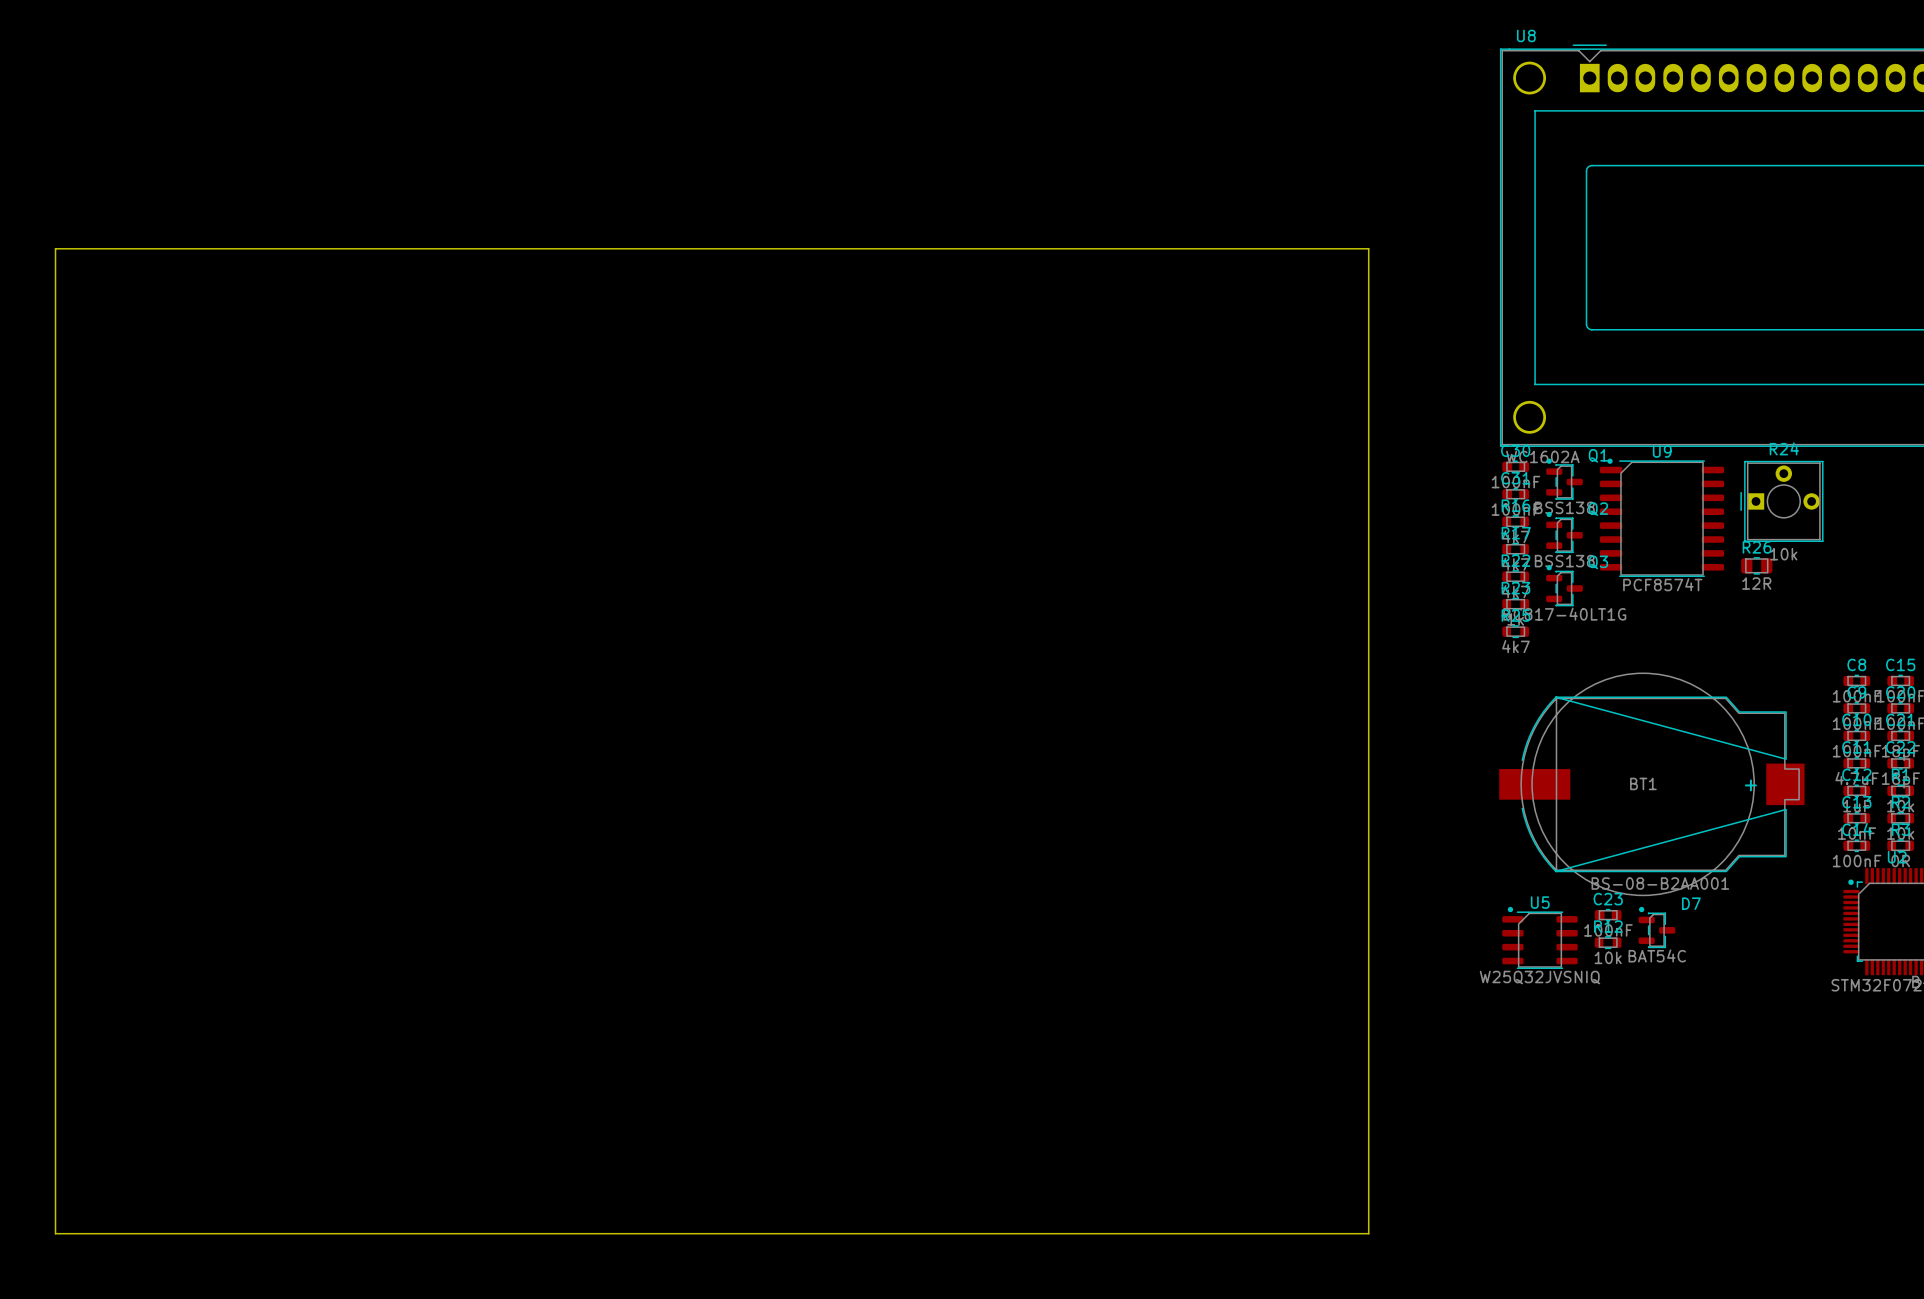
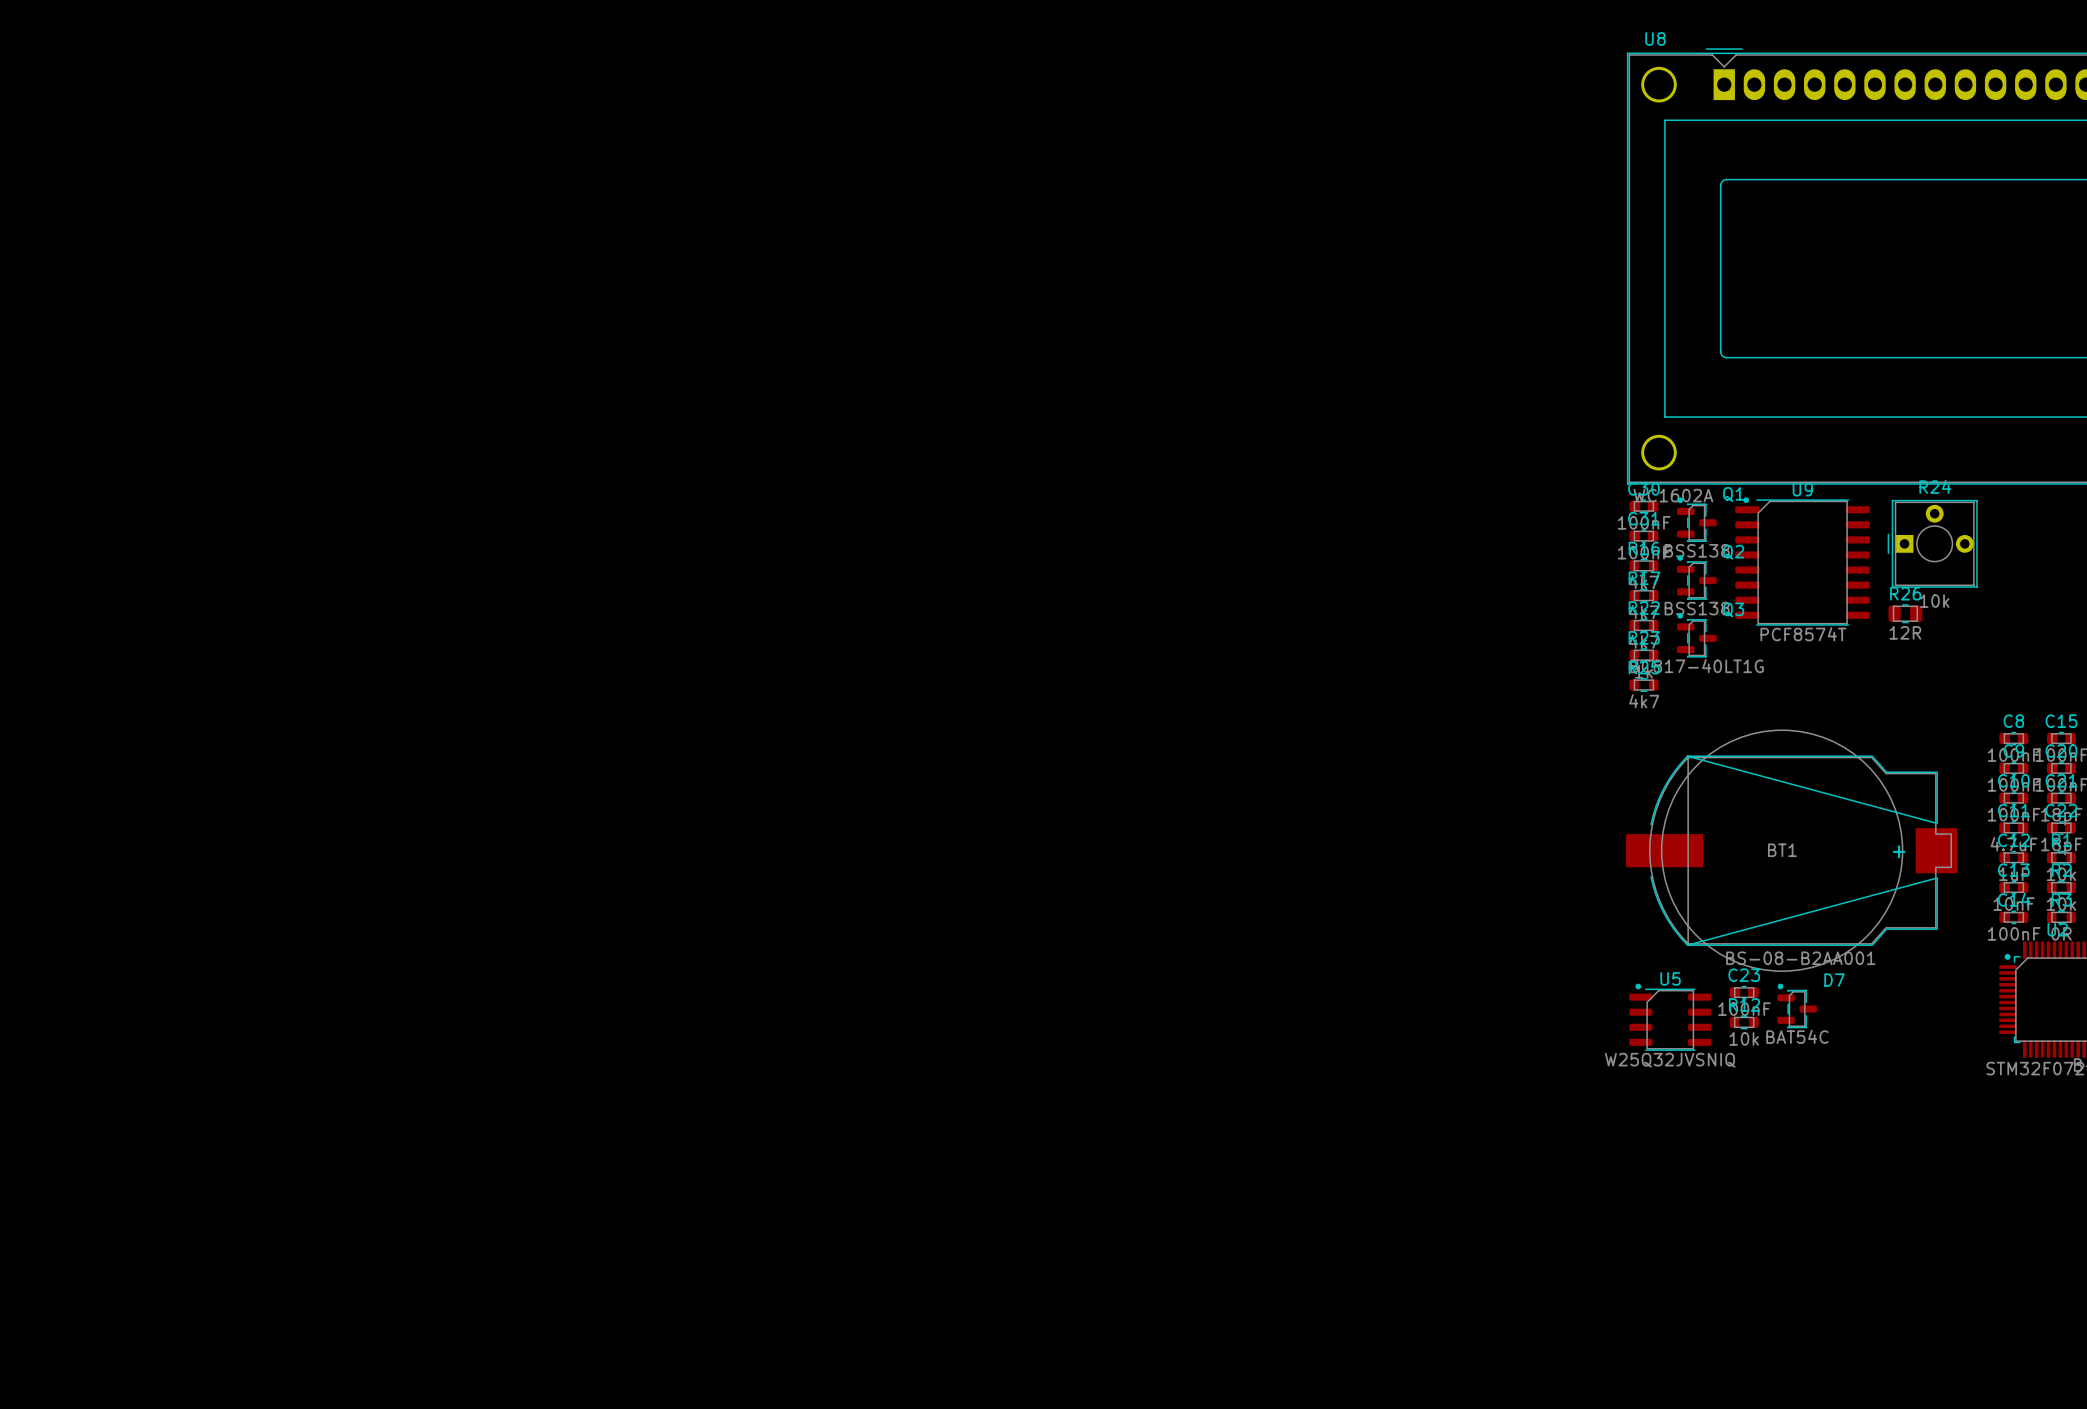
board edge: (55, 248) (1368, 248) (1368, 1233) (55, 1233) (55, 248) -> none

